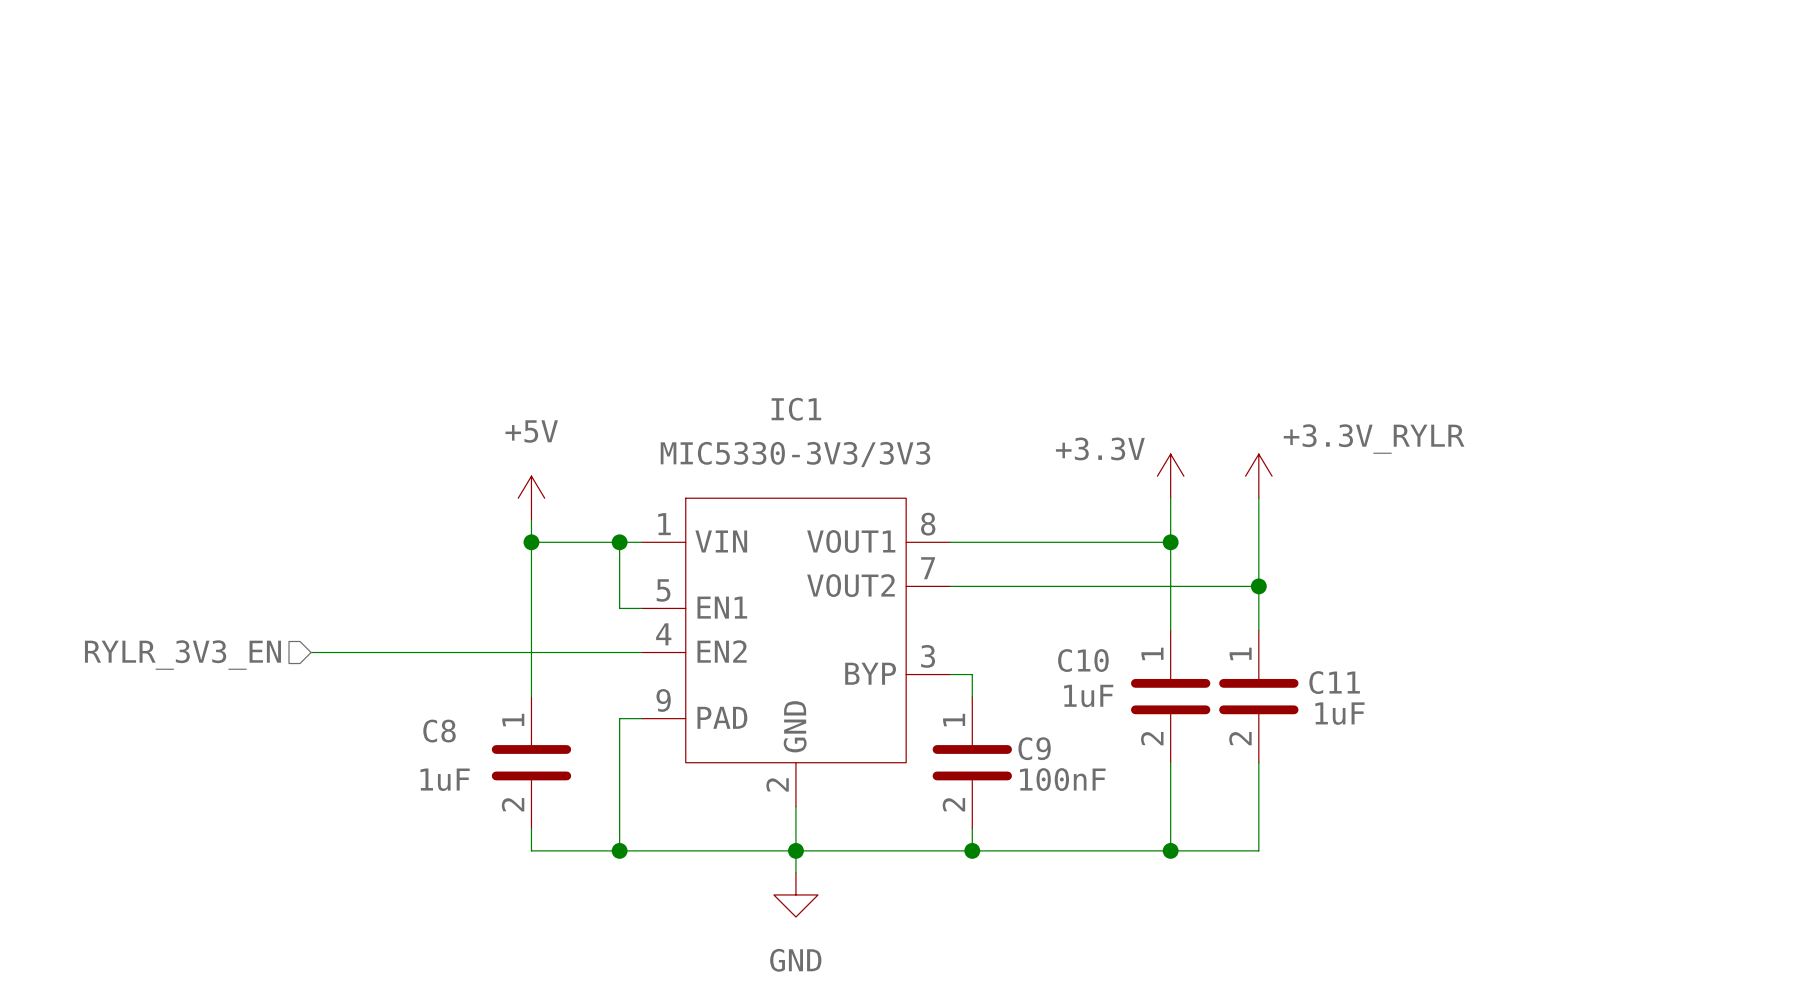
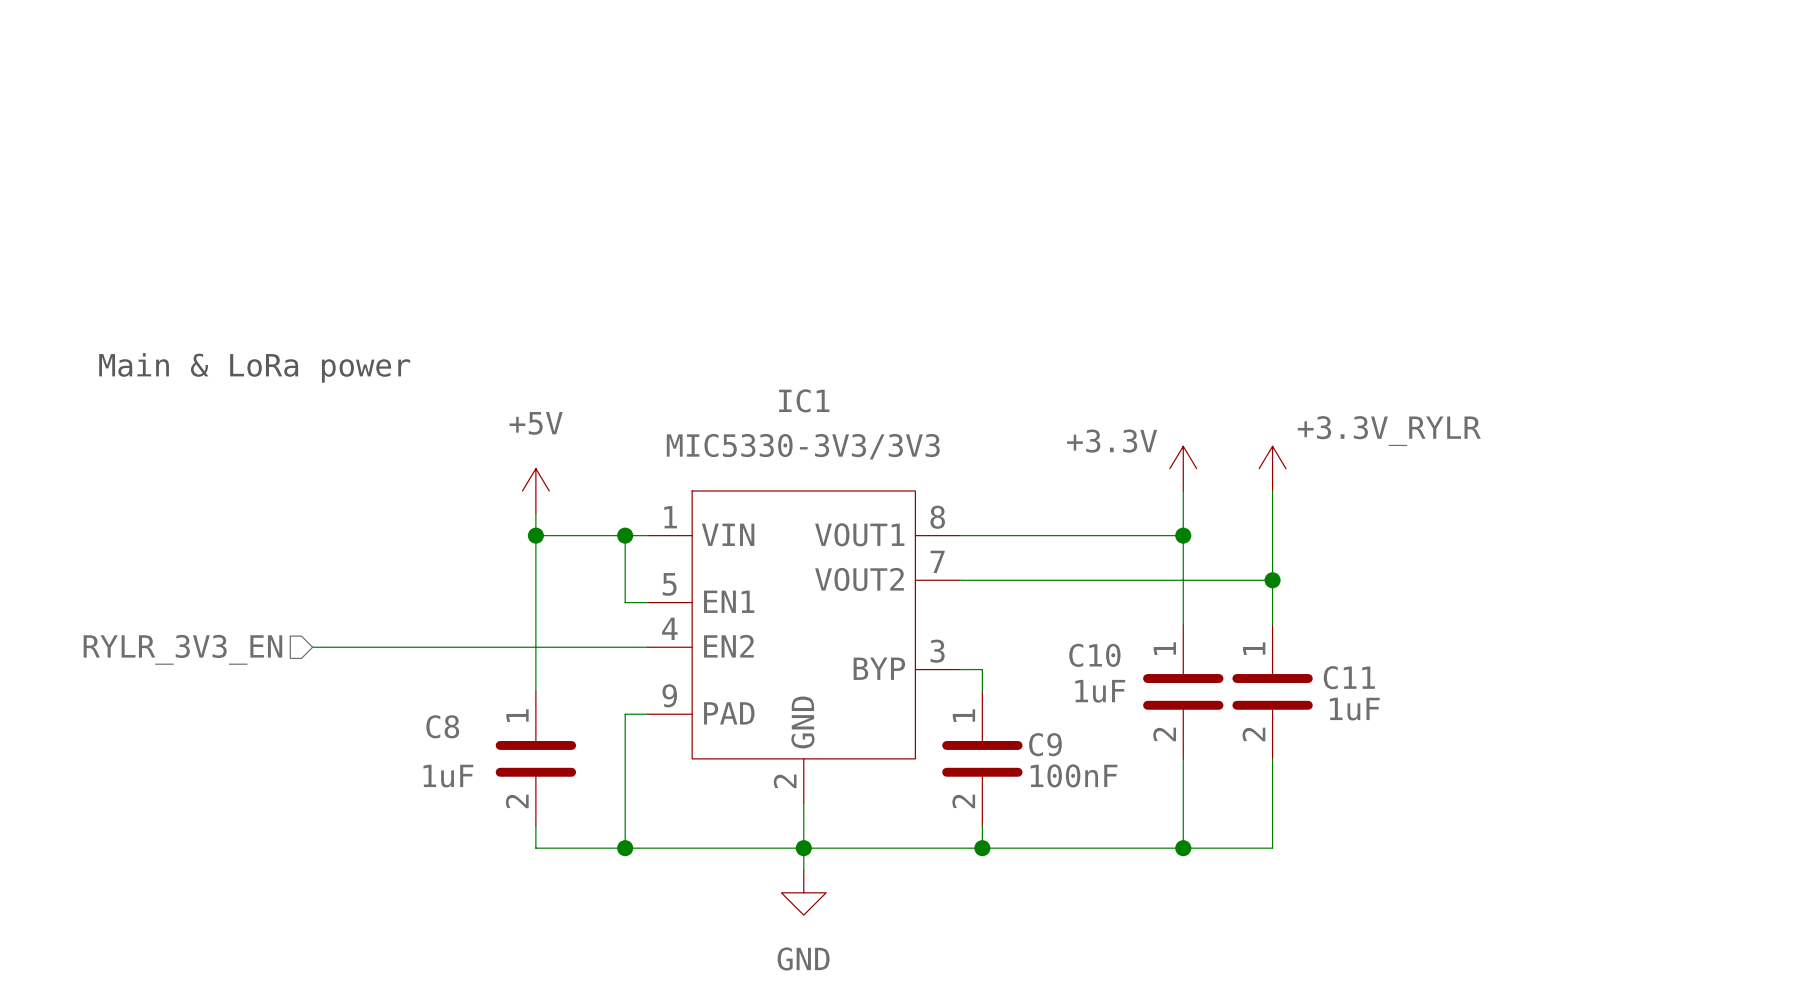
text: none -> Main & LoRa power (254, 367)

